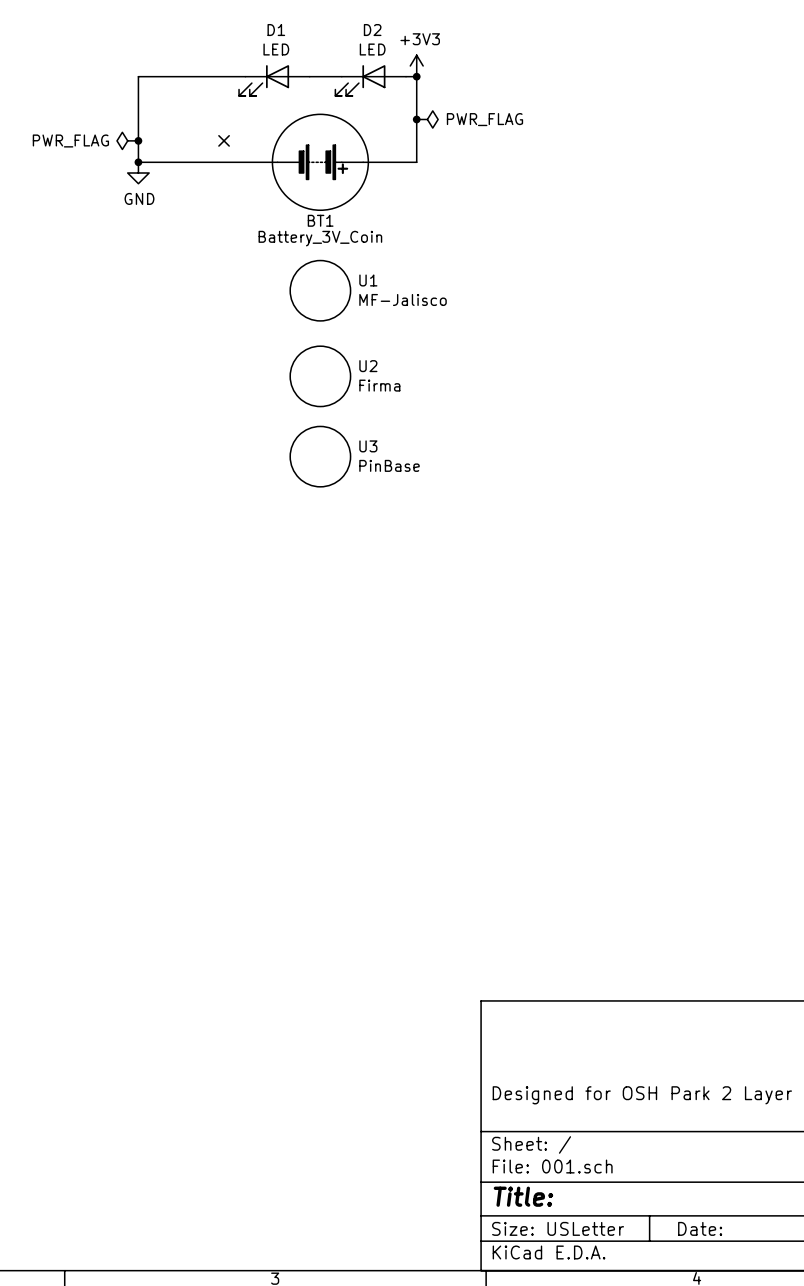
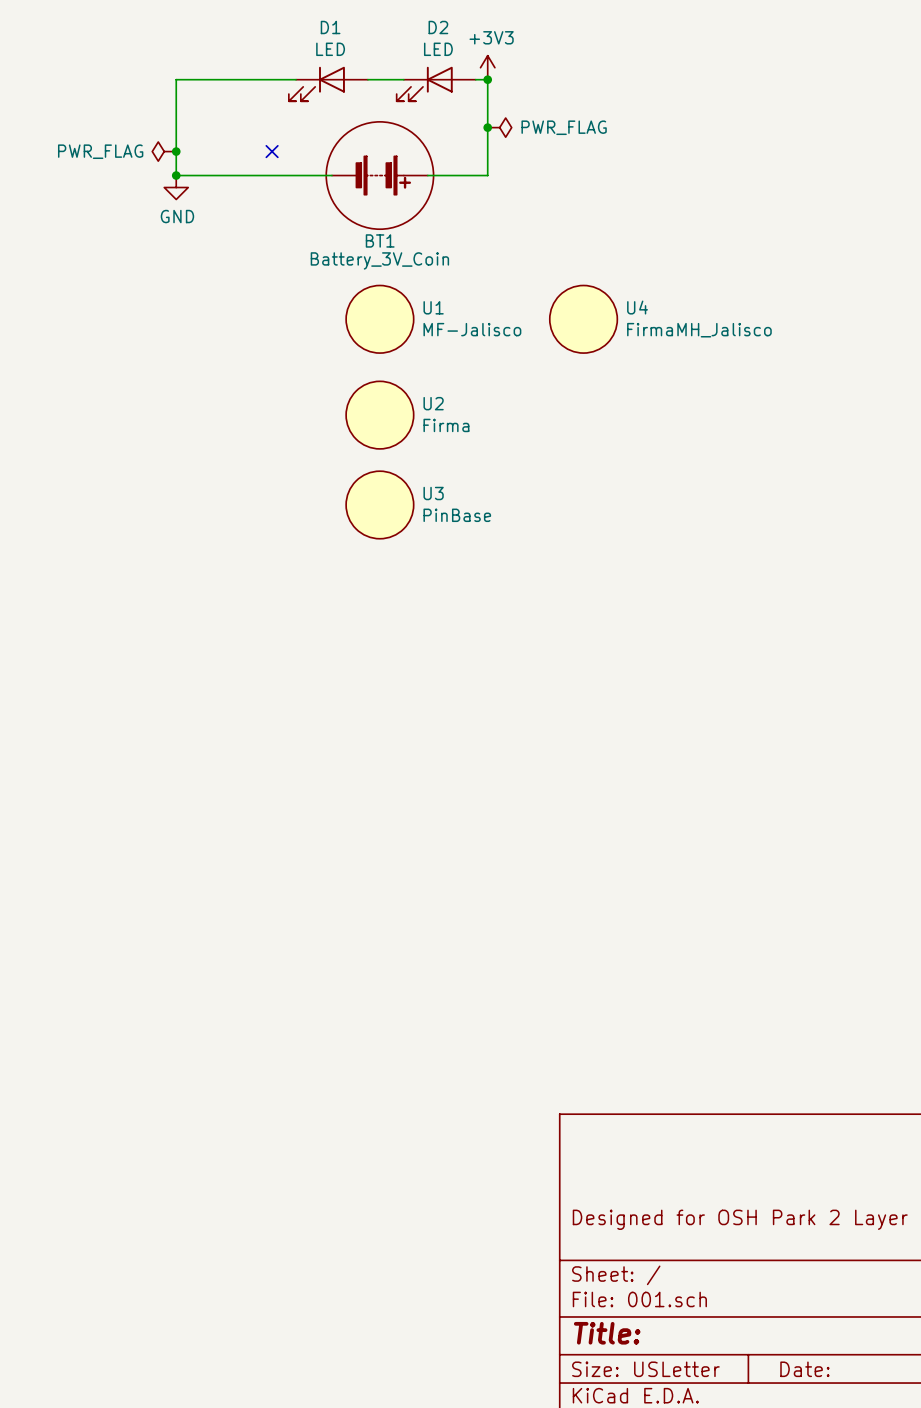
U4: none -> FirmaMH_Jalisco (583, 319)

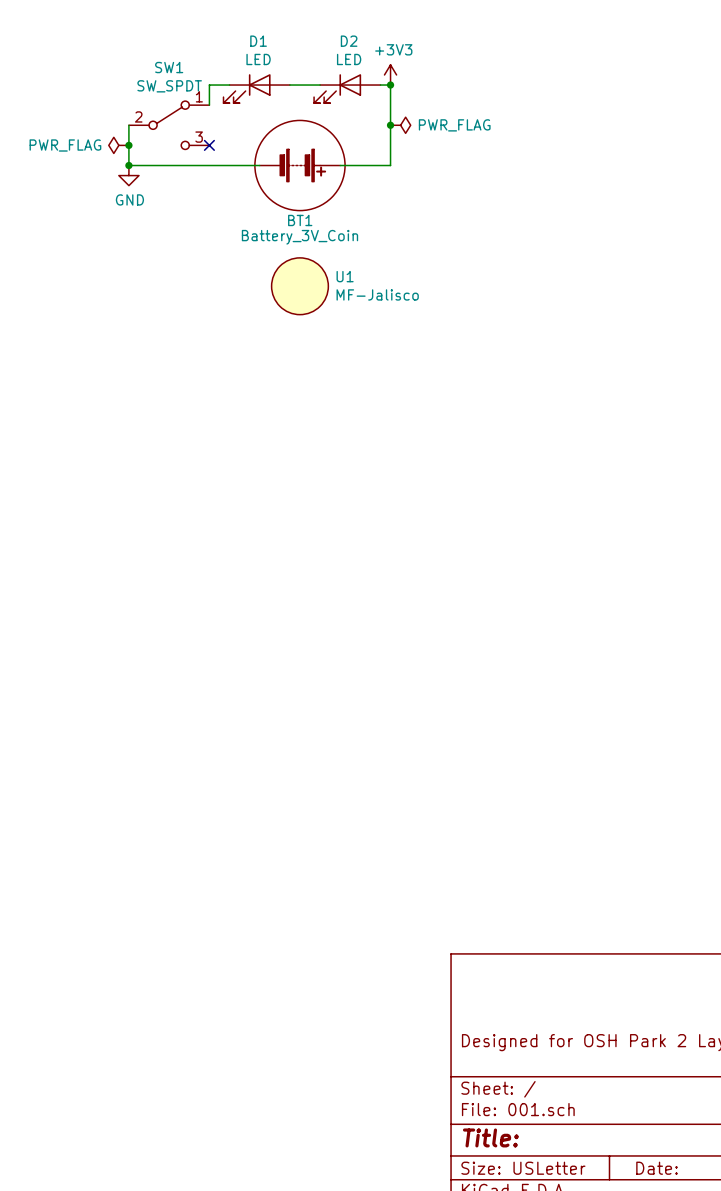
wire: (272, 79) (176, 79) (176, 127) -> (209, 85) (209, 105)
SW1: none -> SW_SPDT (169, 125)
U4: FirmaMH_Jalisco (583, 319) -> none
U2: Firma (379, 415) -> none
U3: PinBase (379, 504) -> none

